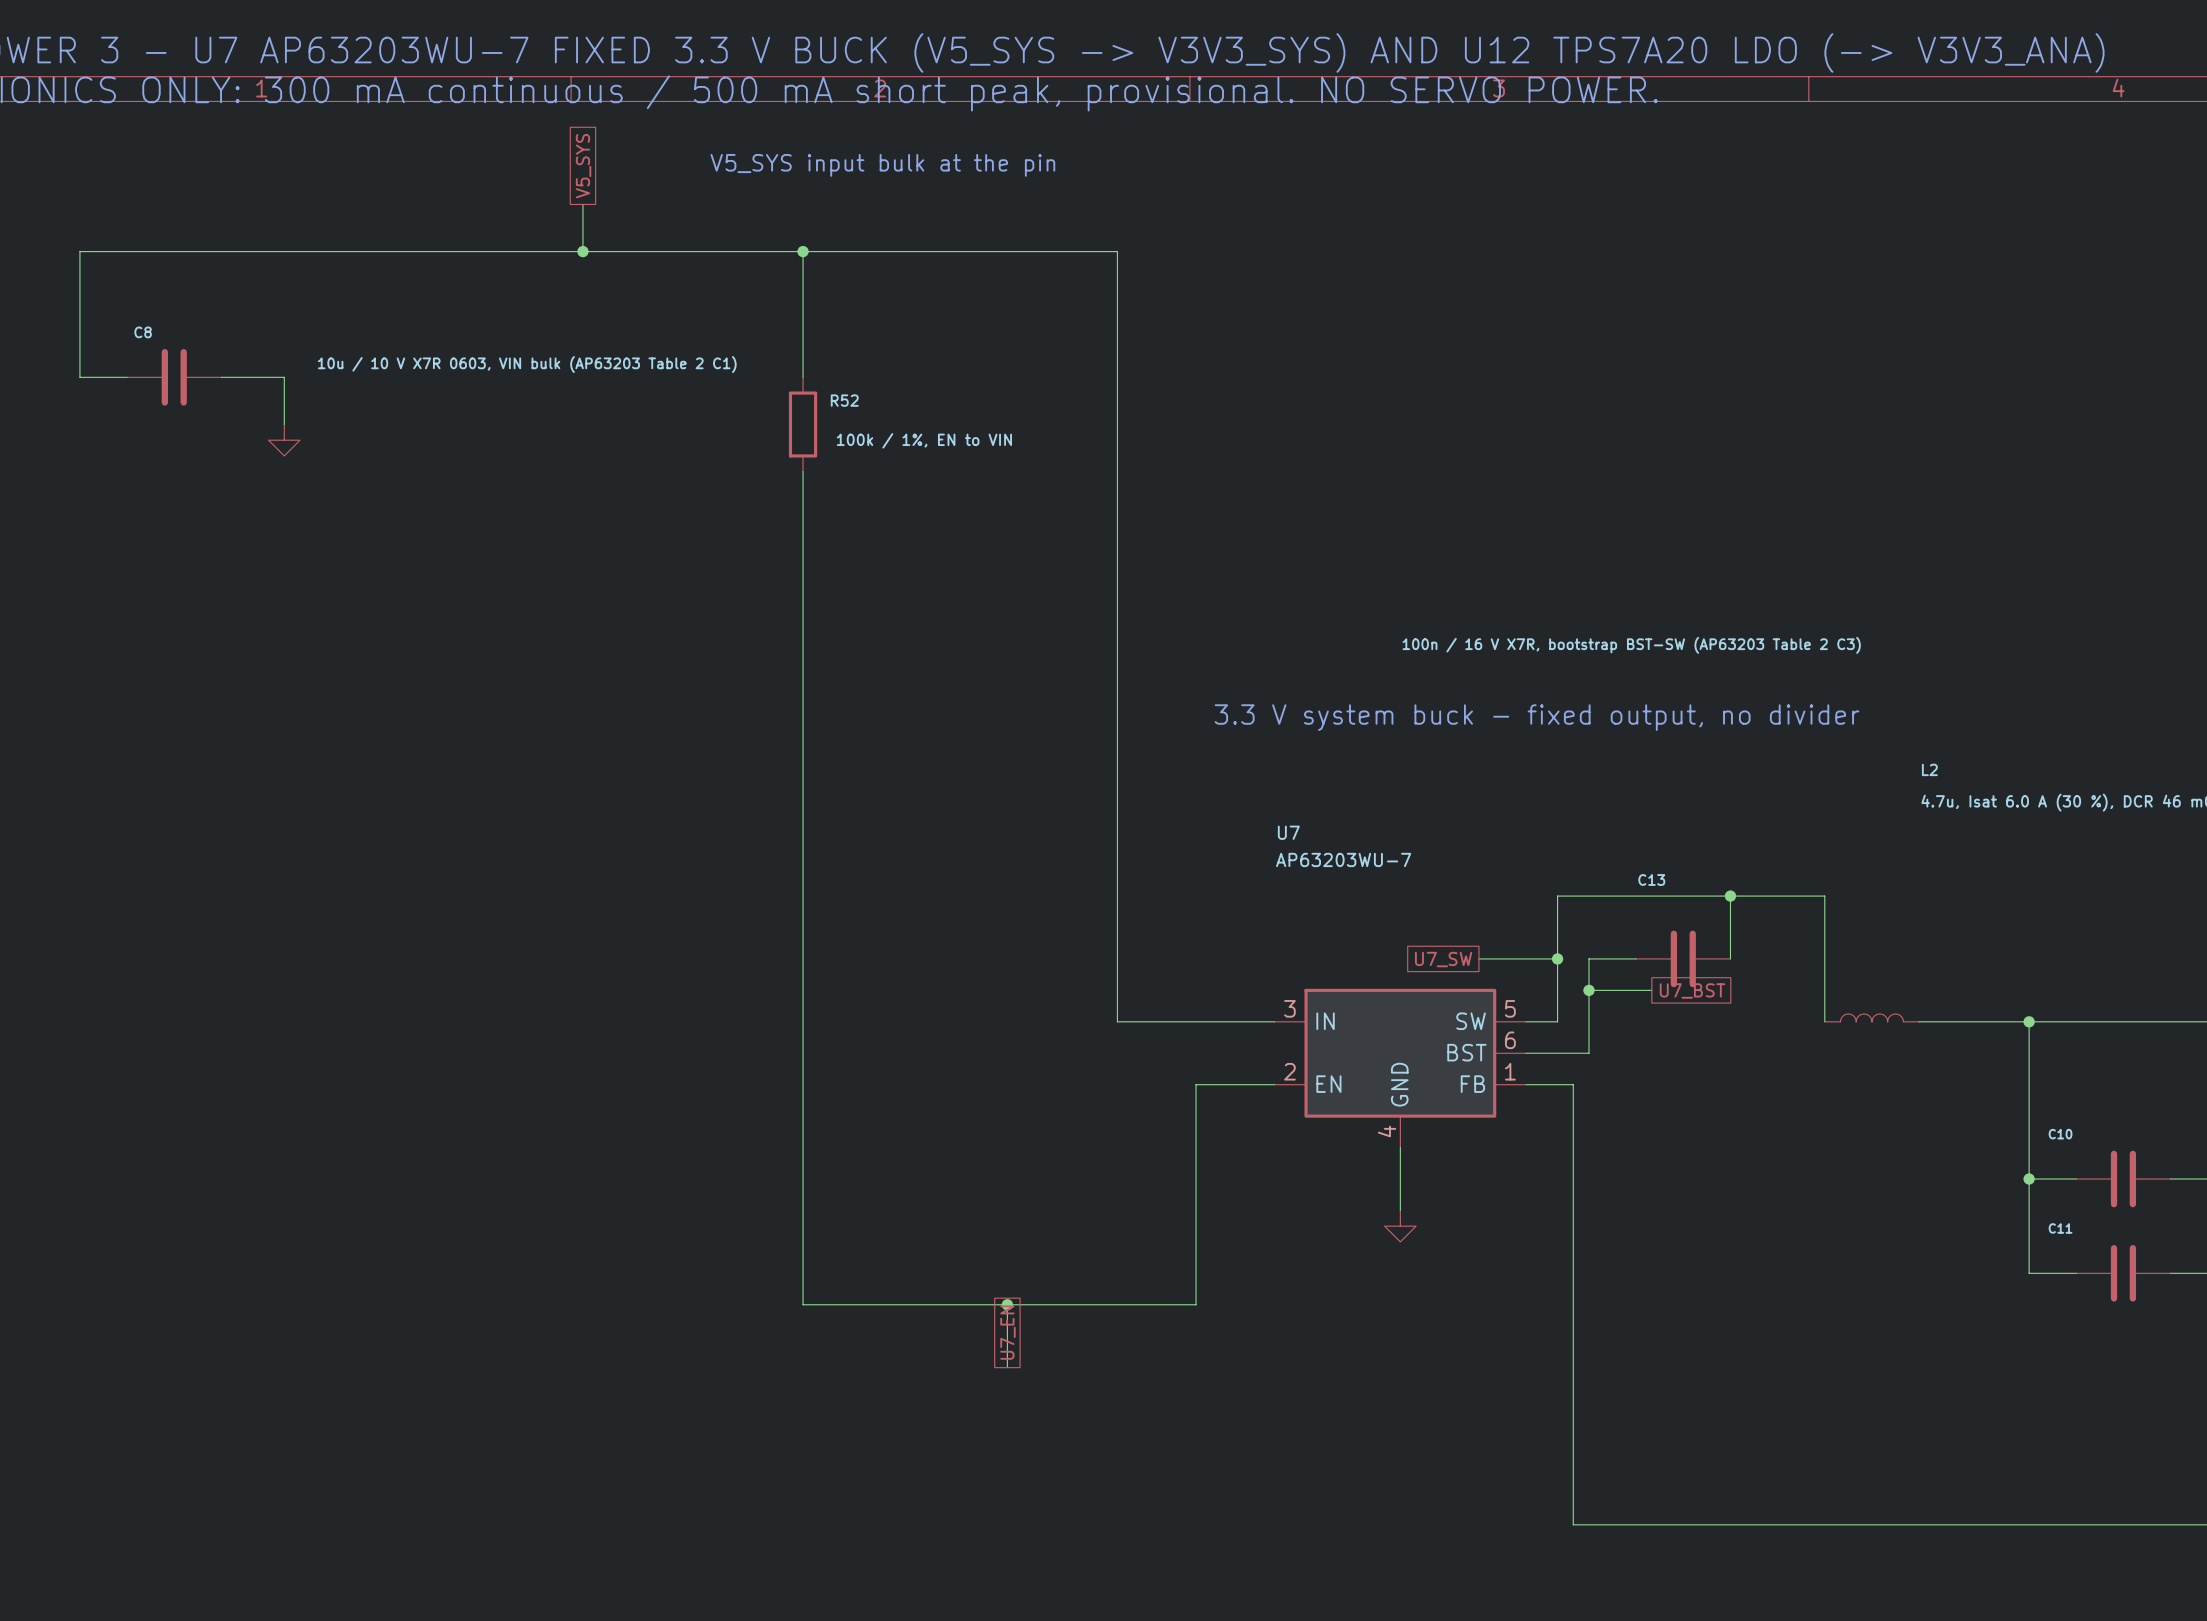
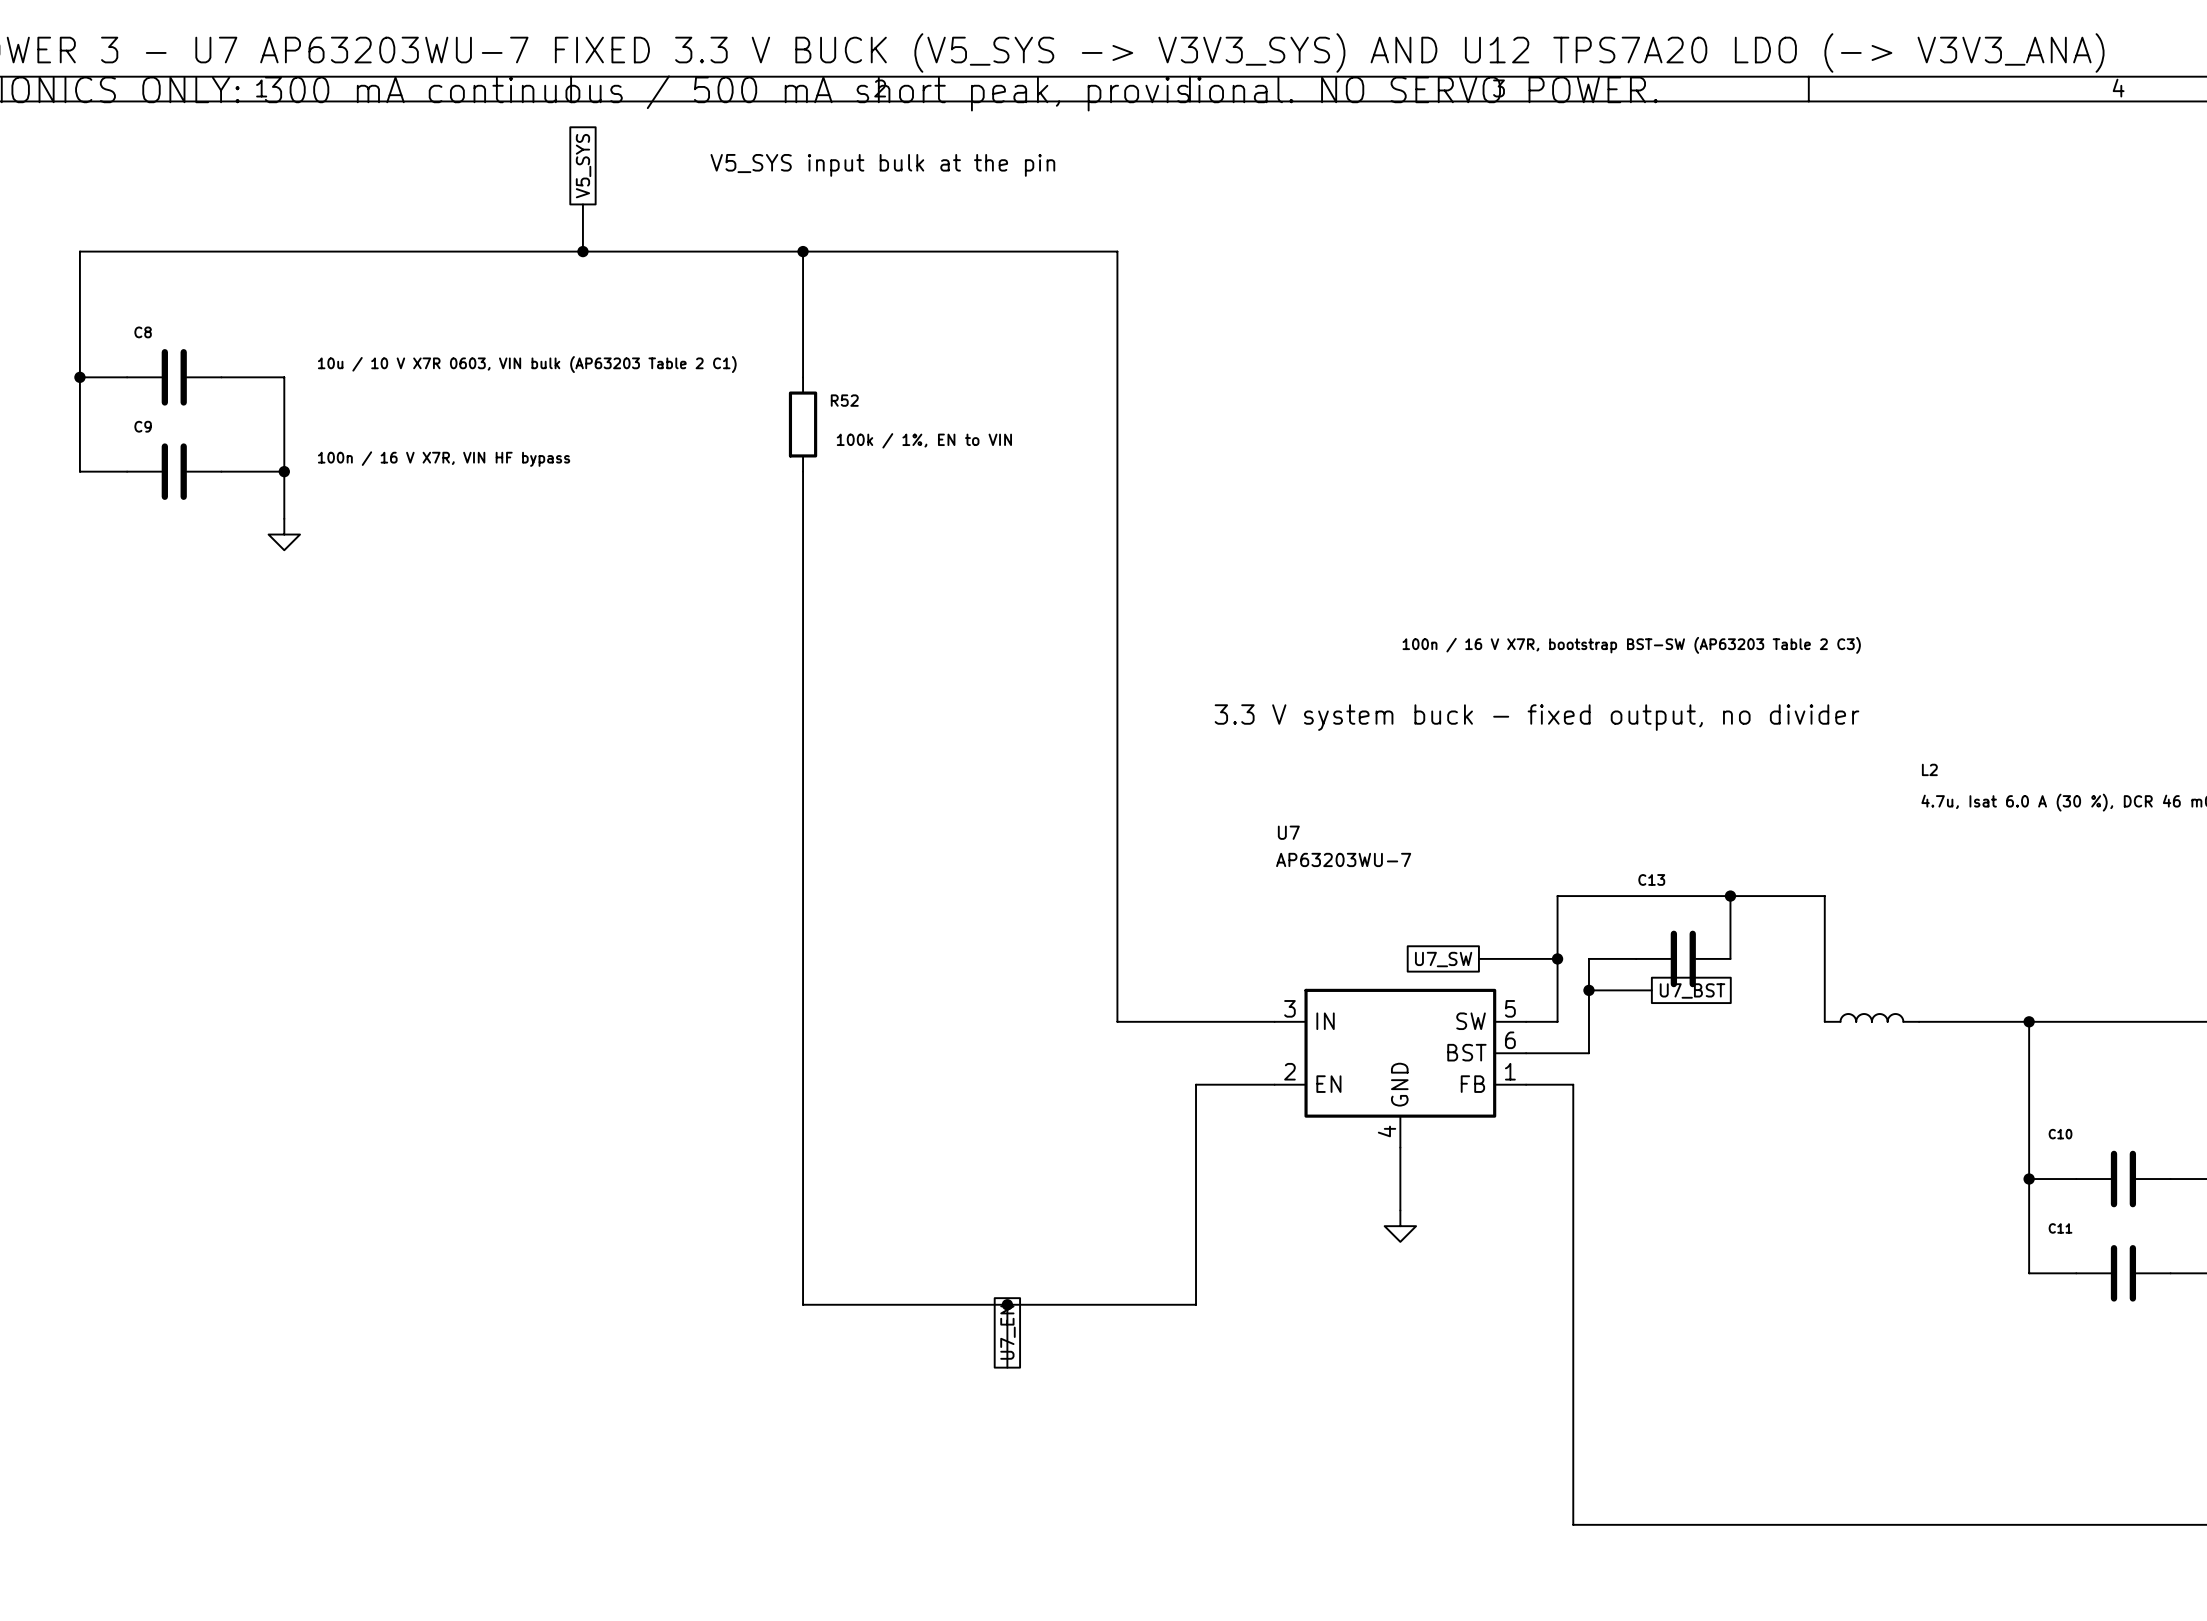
wire: none -> (79, 377) (79, 471) (127, 471)
junction: none -> (79, 377)
wire: none -> (284, 424) (284, 518)
power symbol position: (284, 440) -> (284, 534)
C9: none -> 100n / 16 V X7R, VIN HF bypass (174, 471)
wire: none -> (221, 471) (284, 471)
junction: none -> (284, 471)

